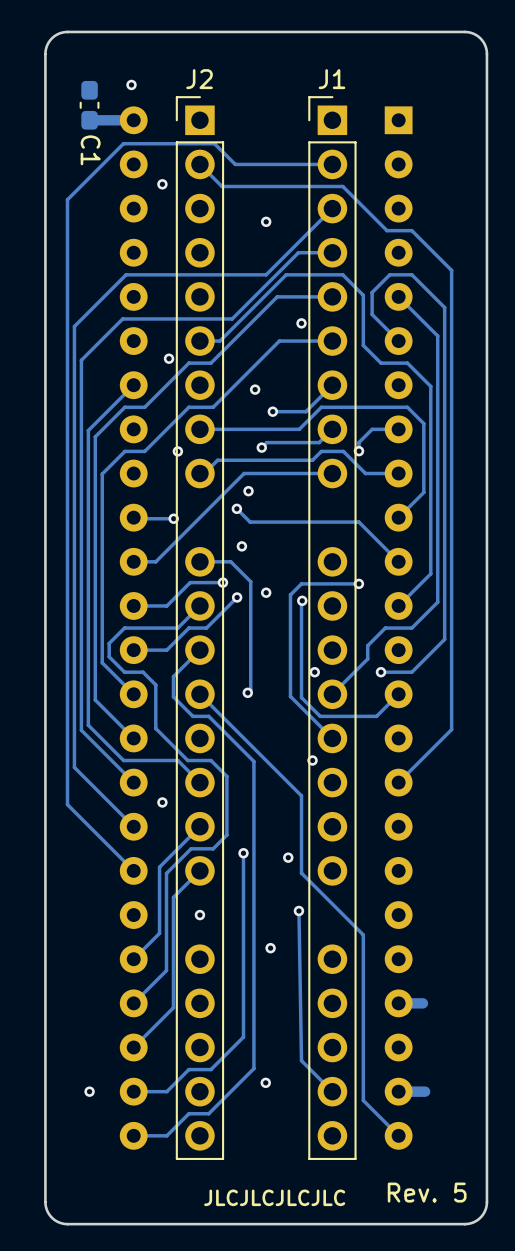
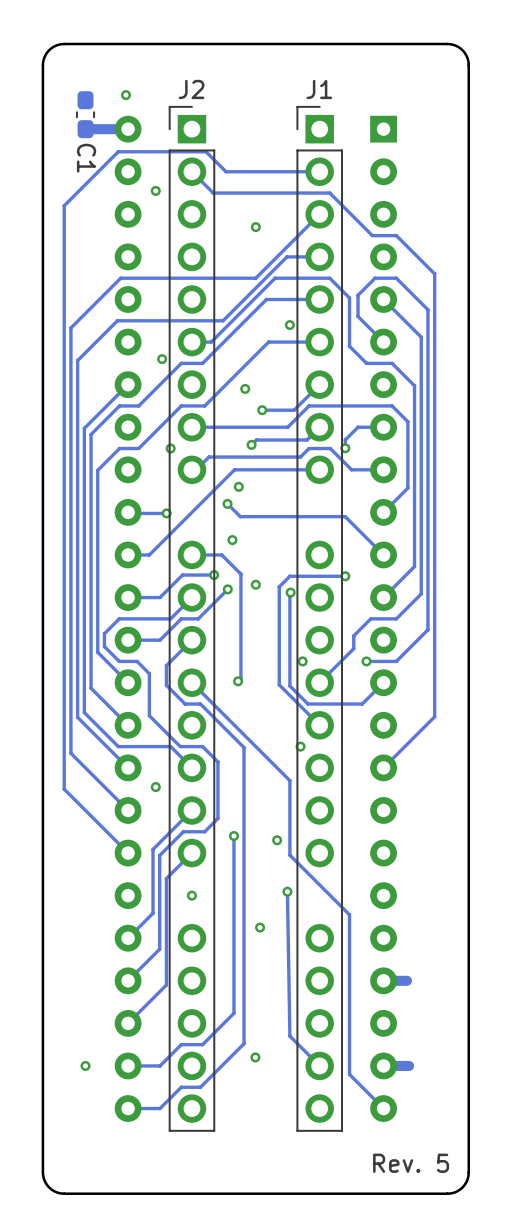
text: JLCJLCJLCJLC (274, 1197) -> none

